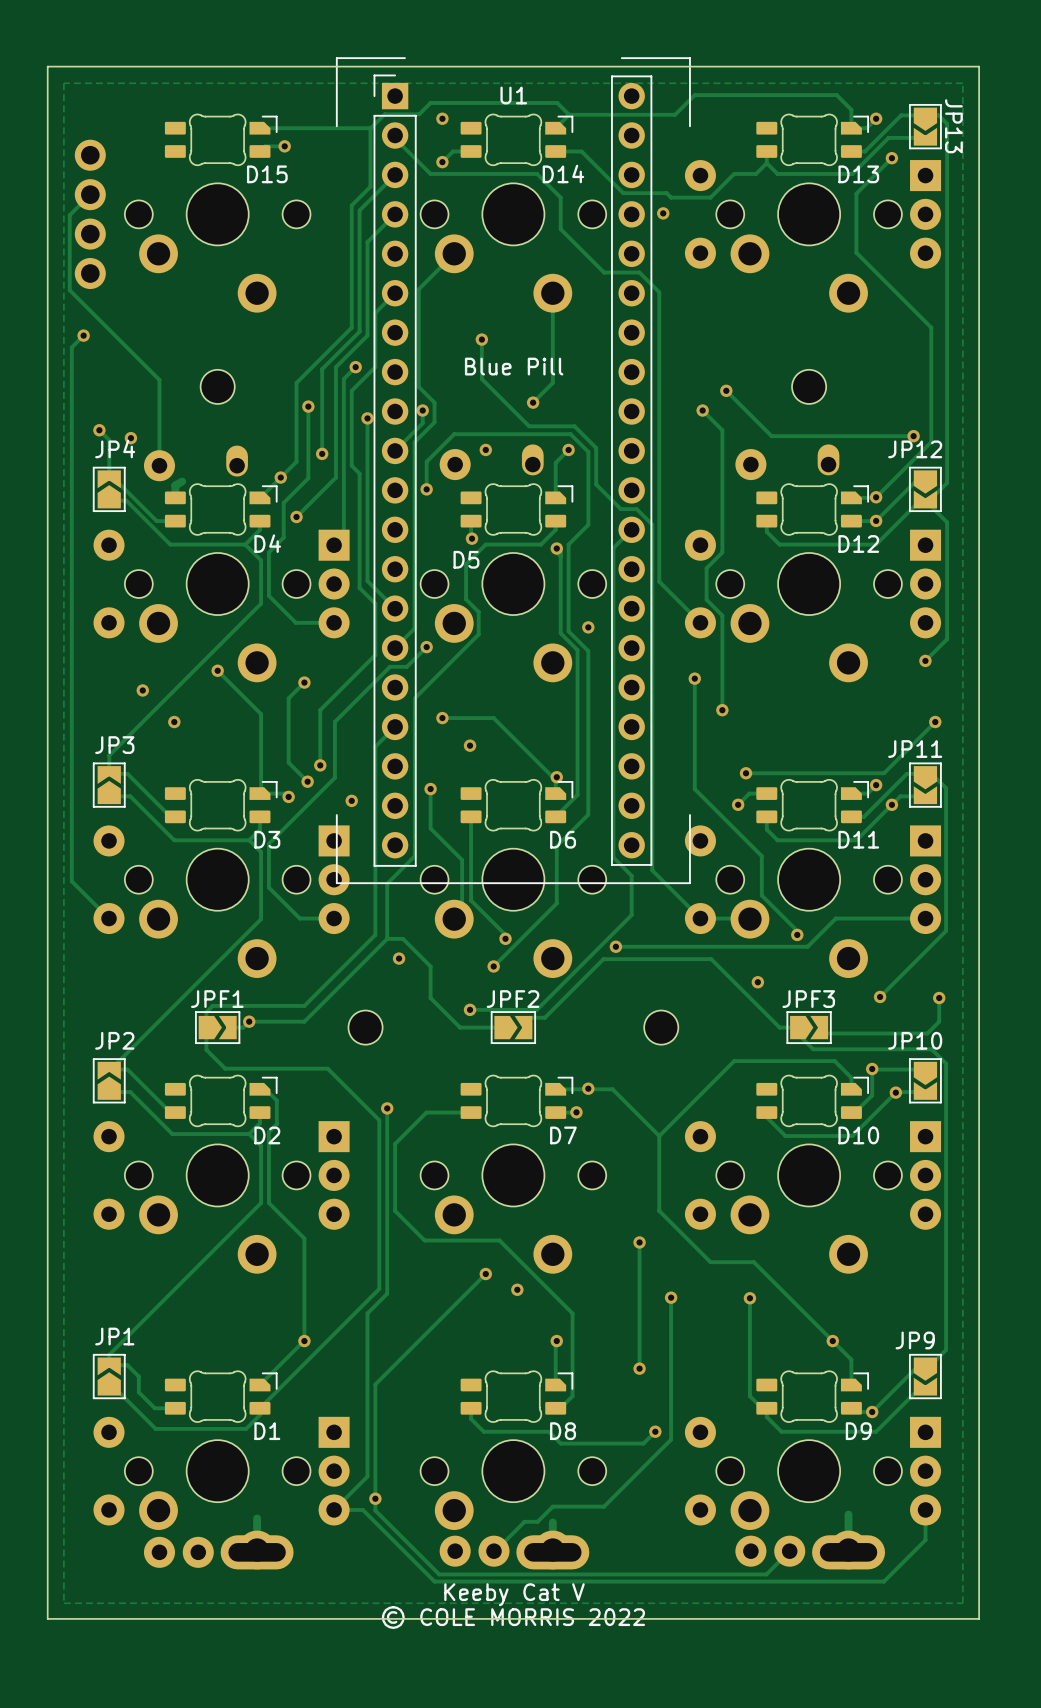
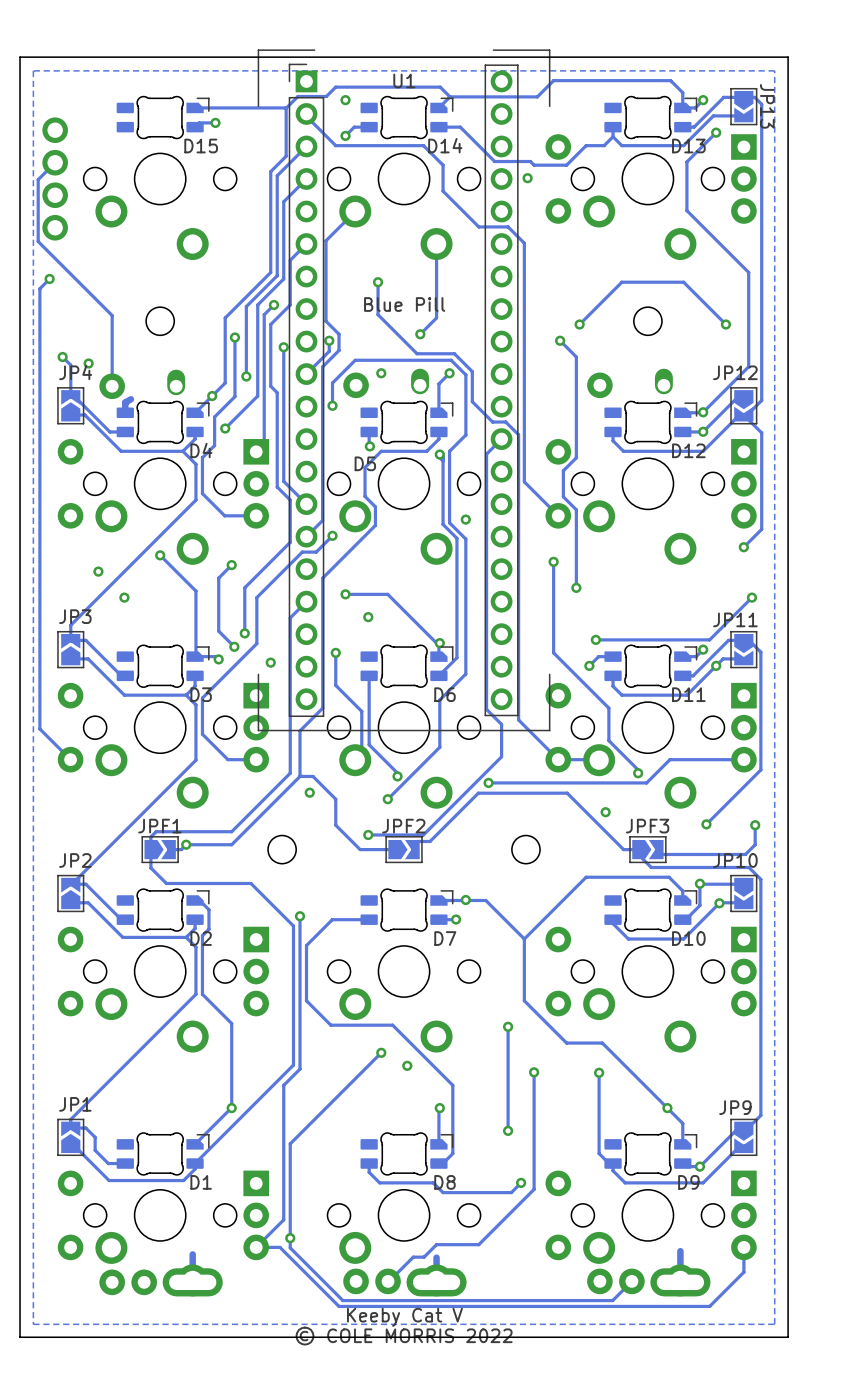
track: (726, 390) (771, 436) (913, 436) -> (579, 324) (621, 282) (683, 282) (725, 324)
via position: (913, 436) -> (725, 324)

